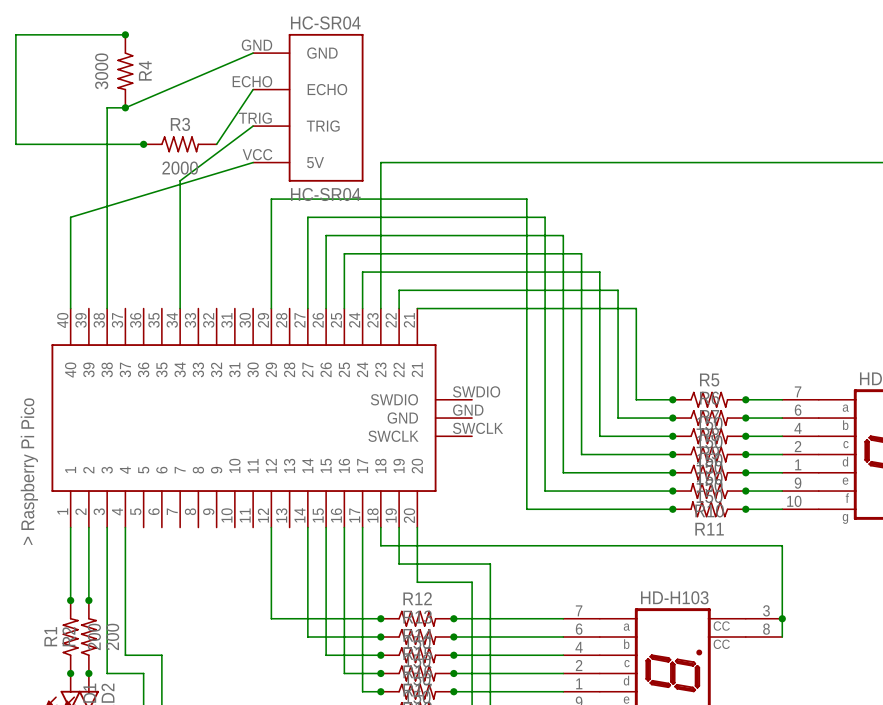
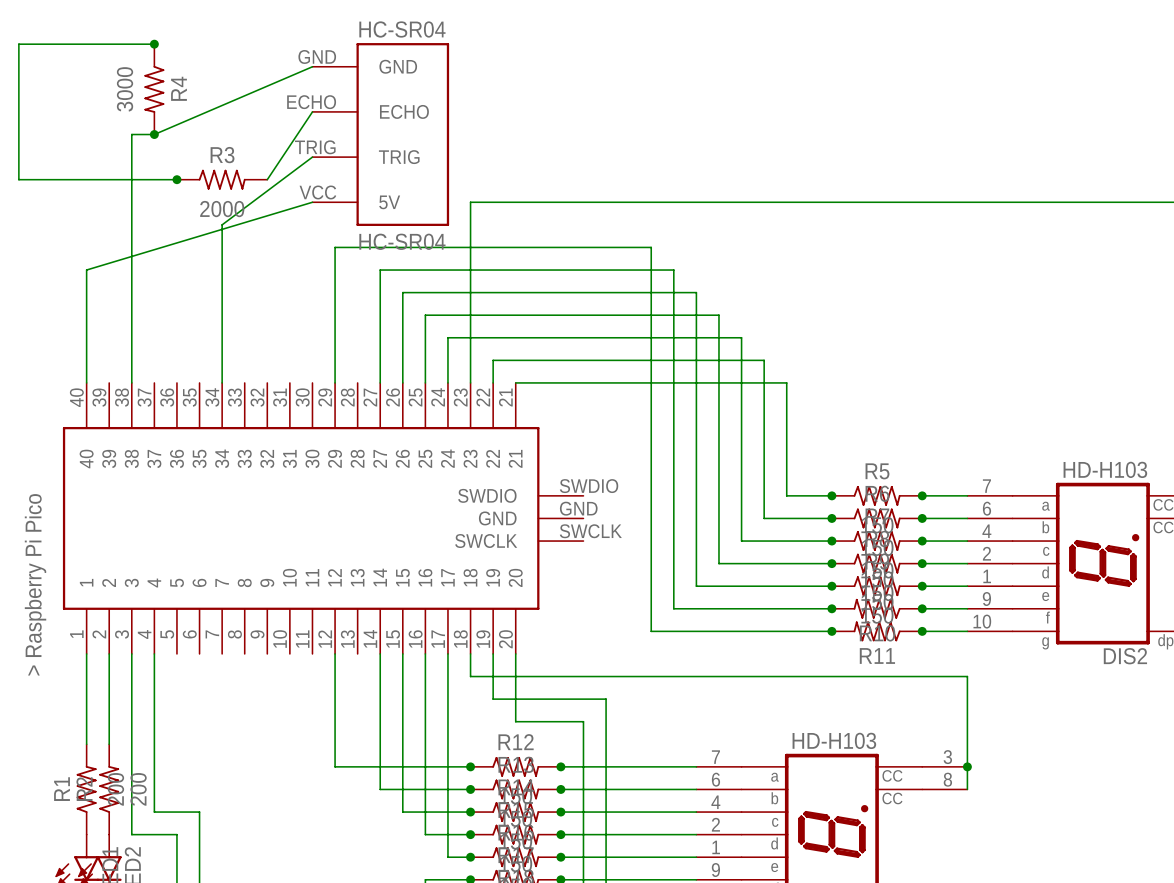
junction: (70, 600) -> none
junction: (88, 600) -> none
junction: (70, 673) -> none
junction: (88, 673) -> none

